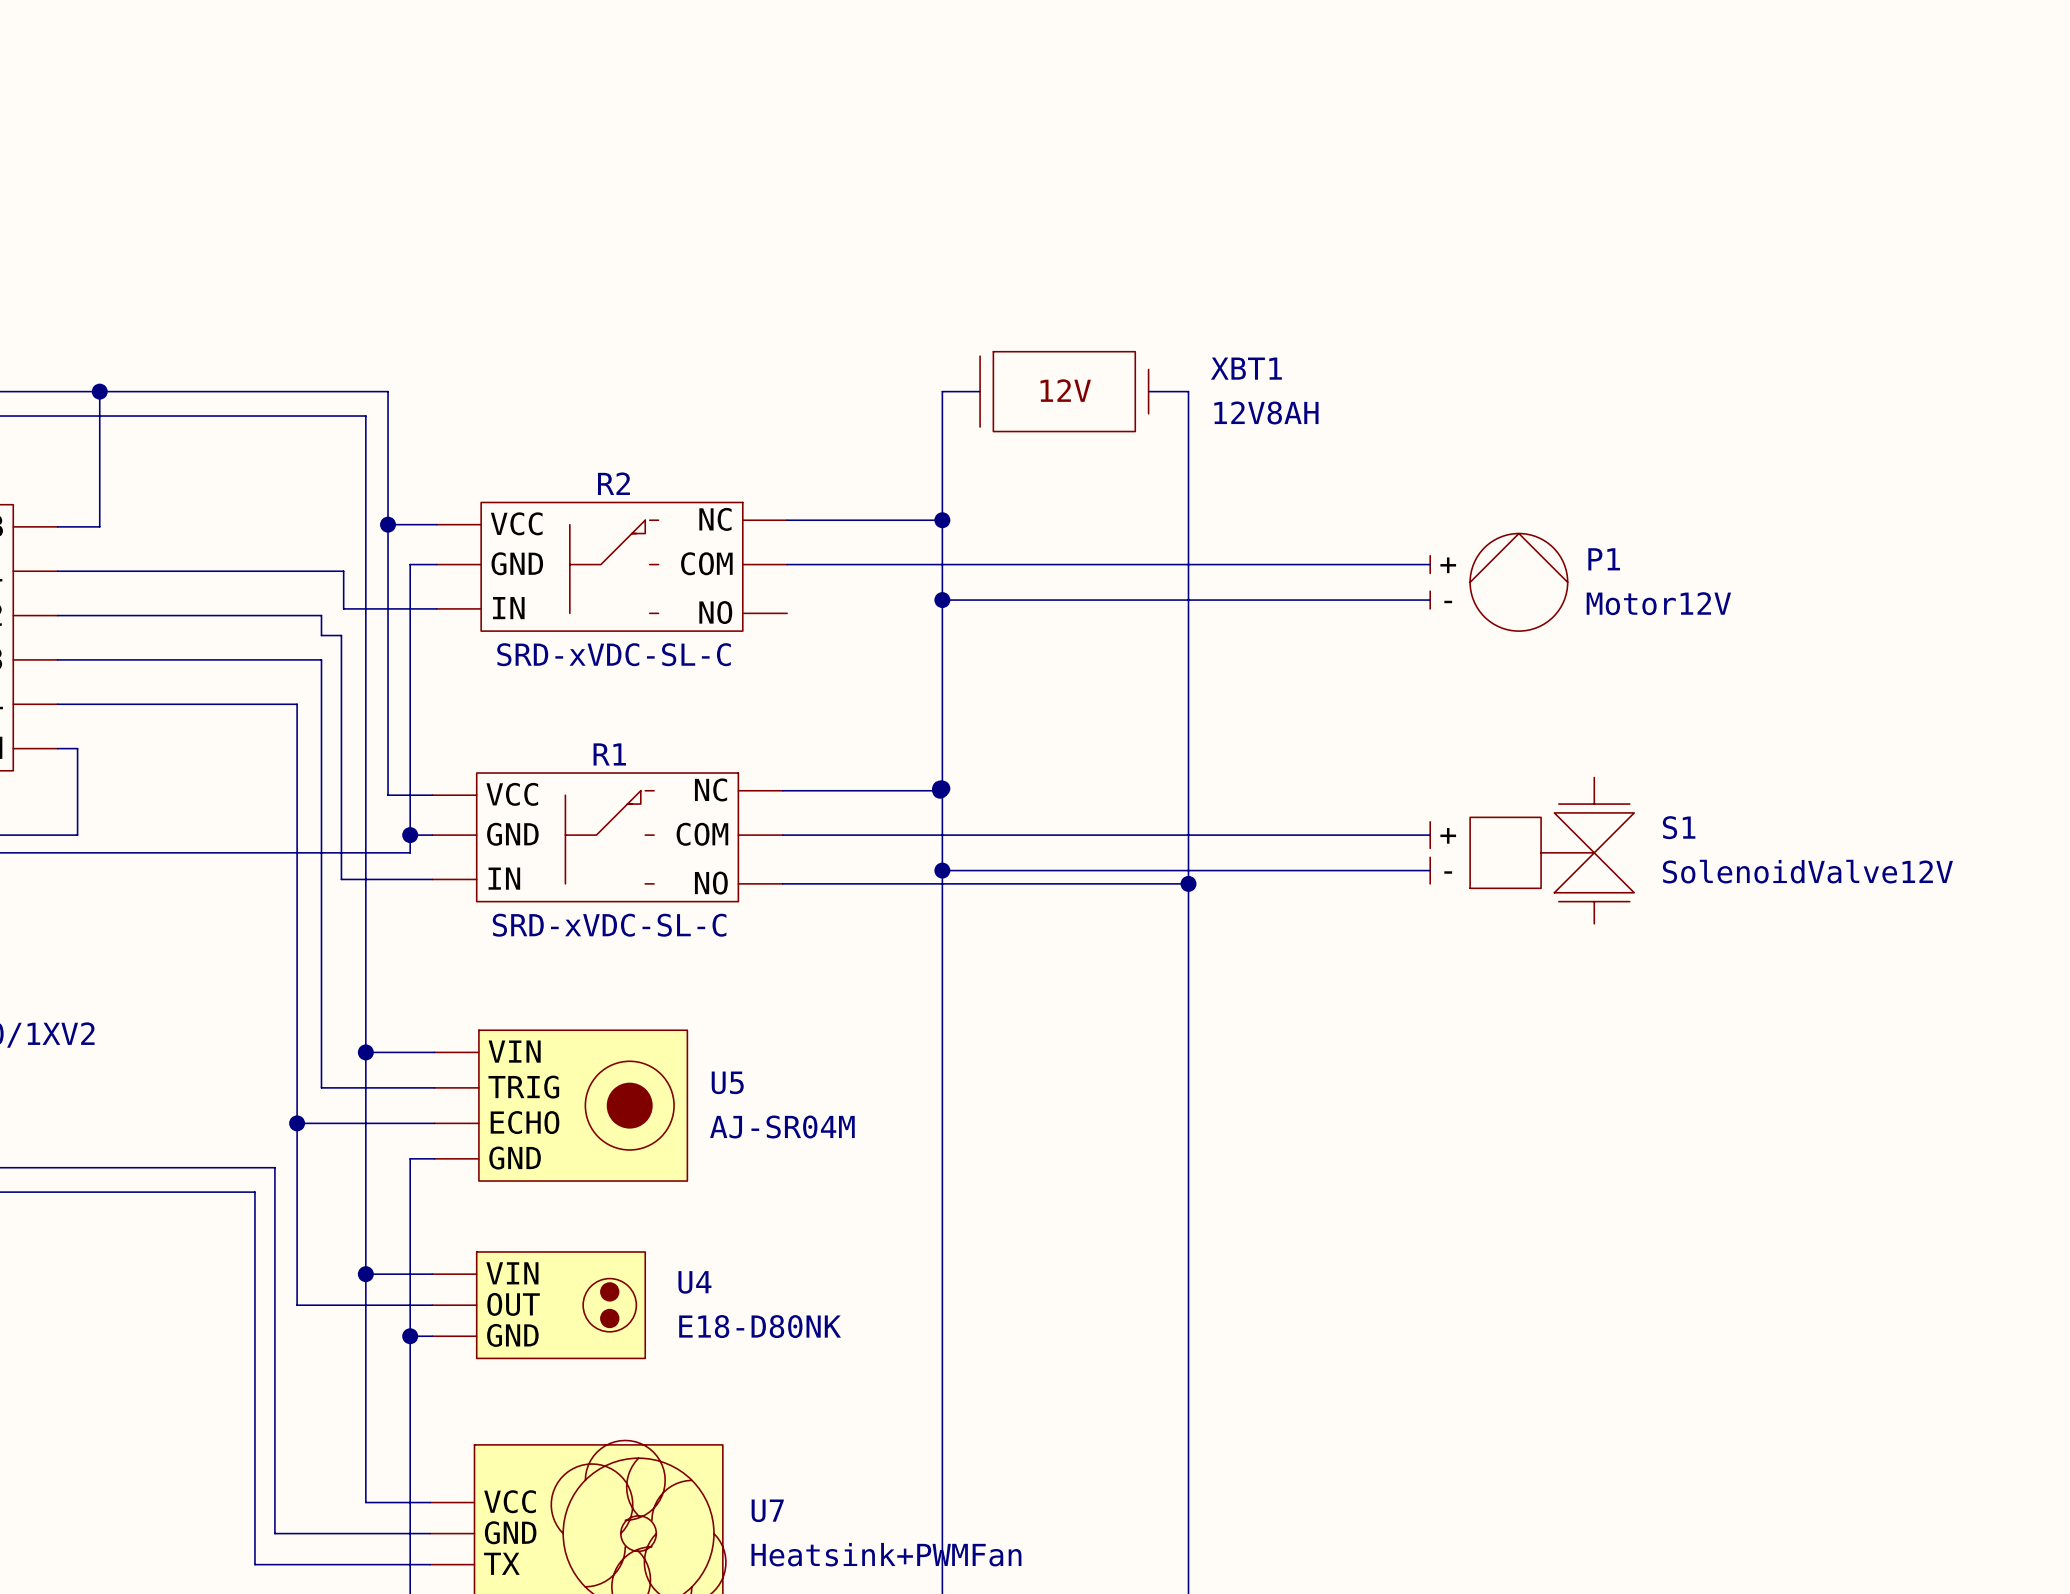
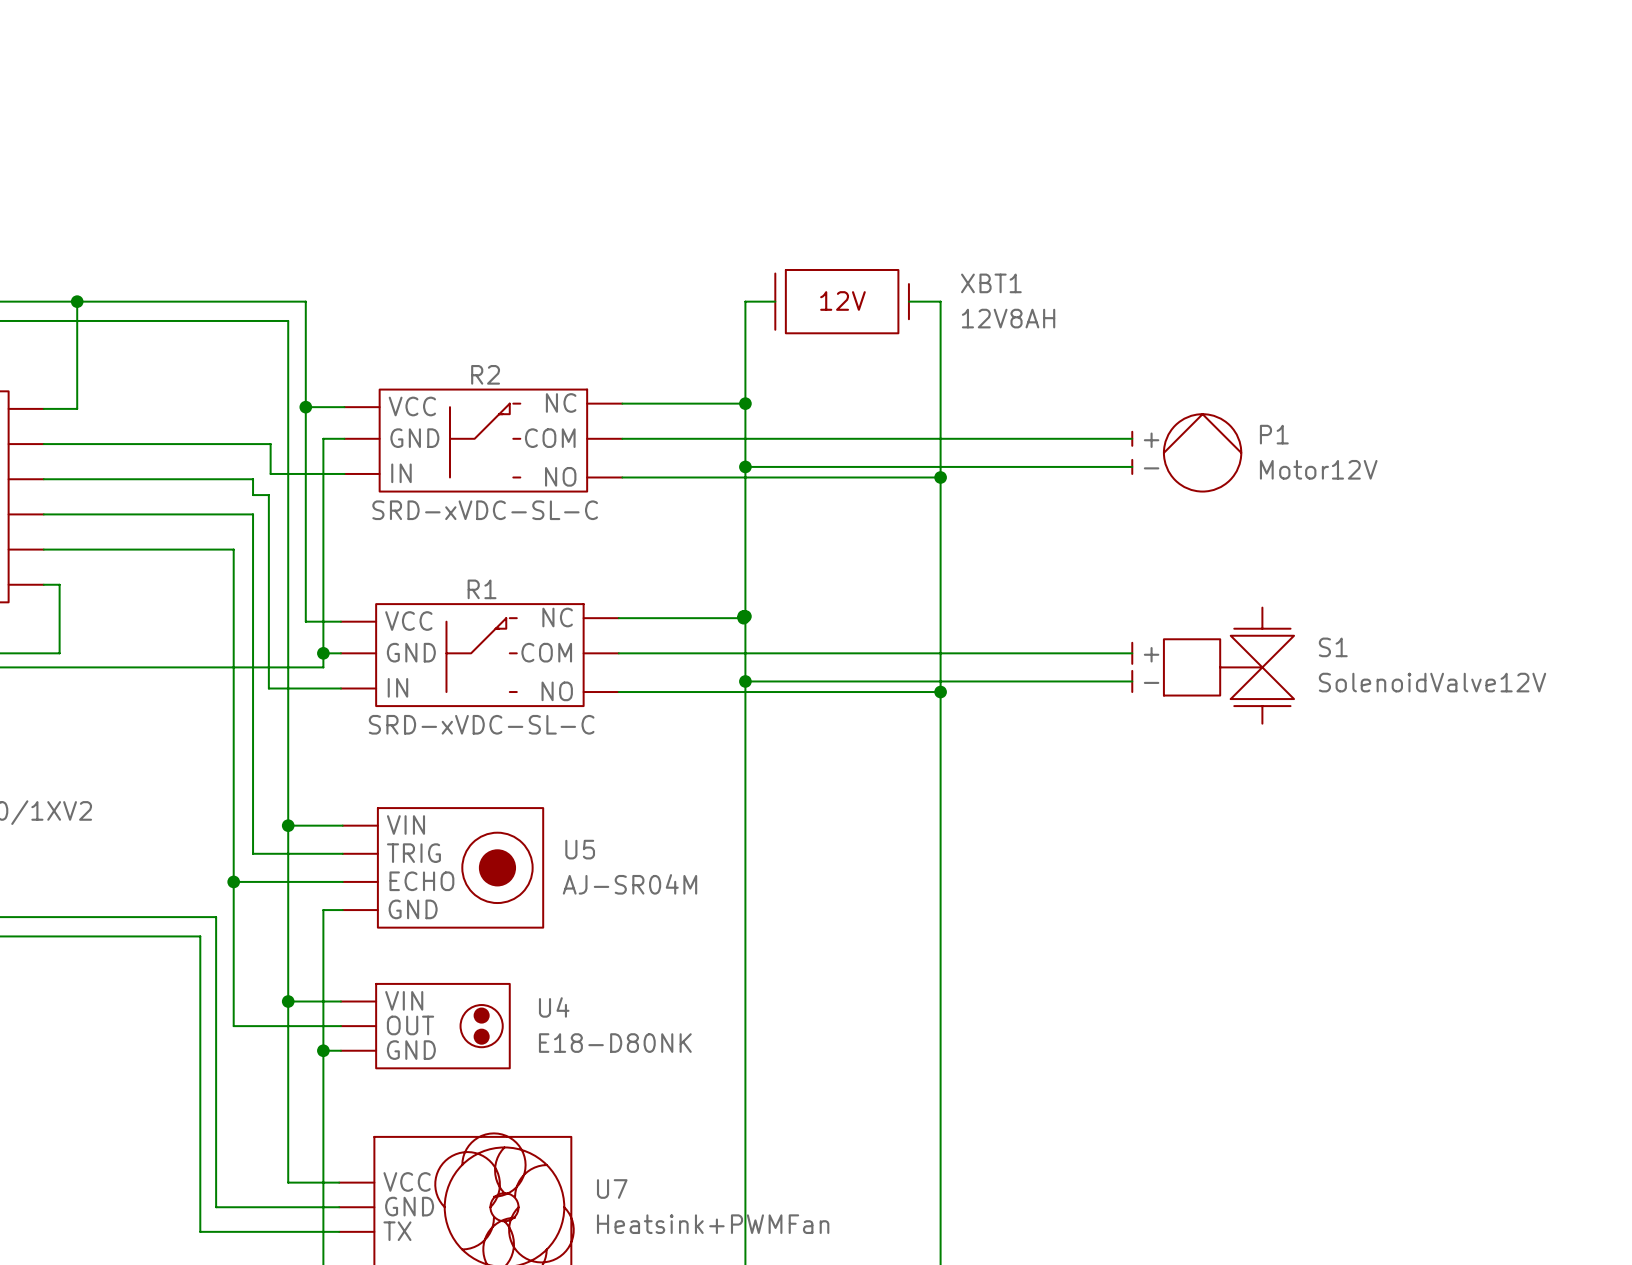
wire: none -> (622, 477) (940, 477)
junction: none -> (940, 477)

